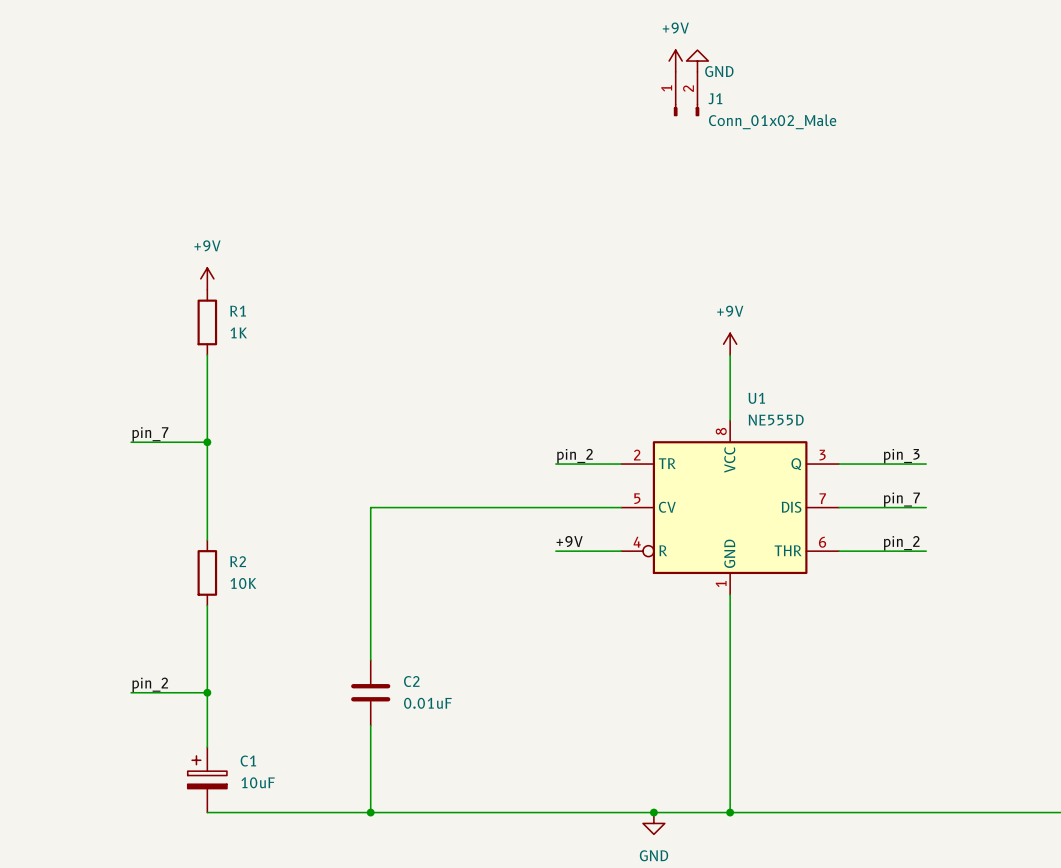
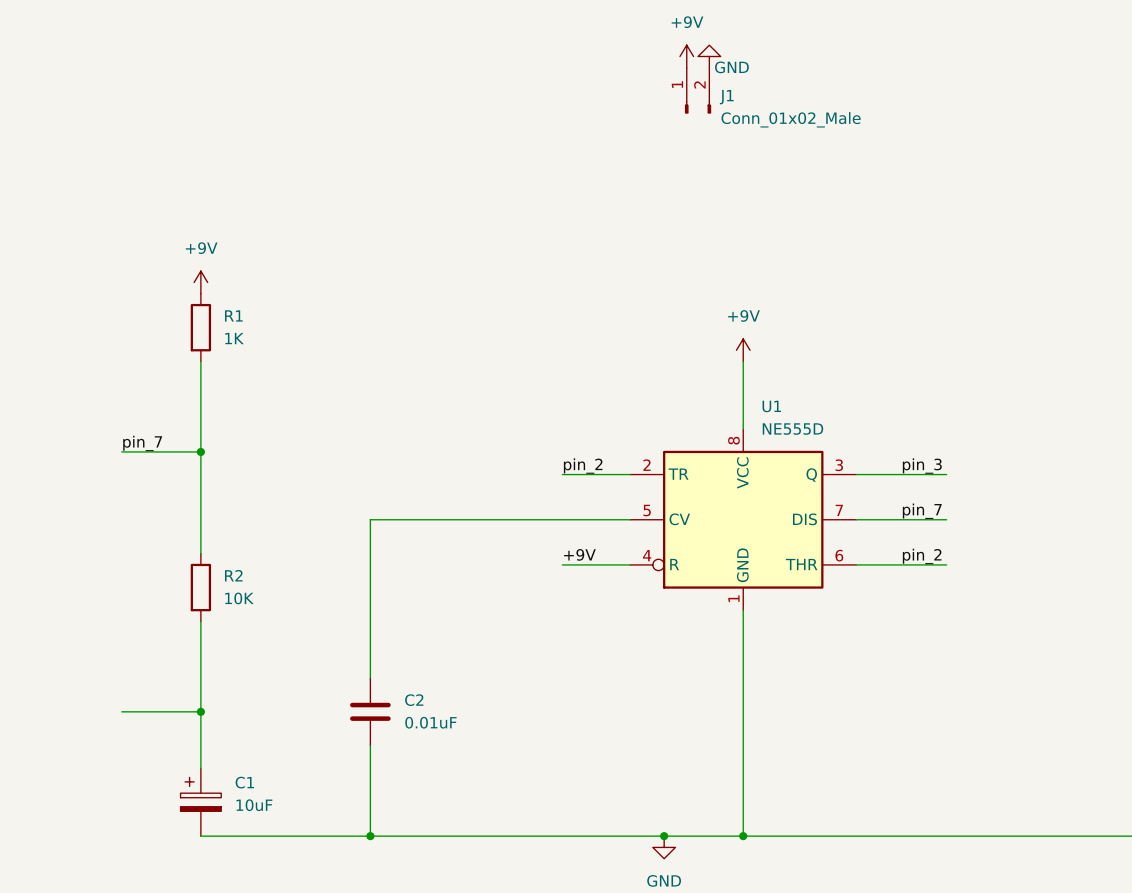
label: pin_2 (150, 684) -> none

